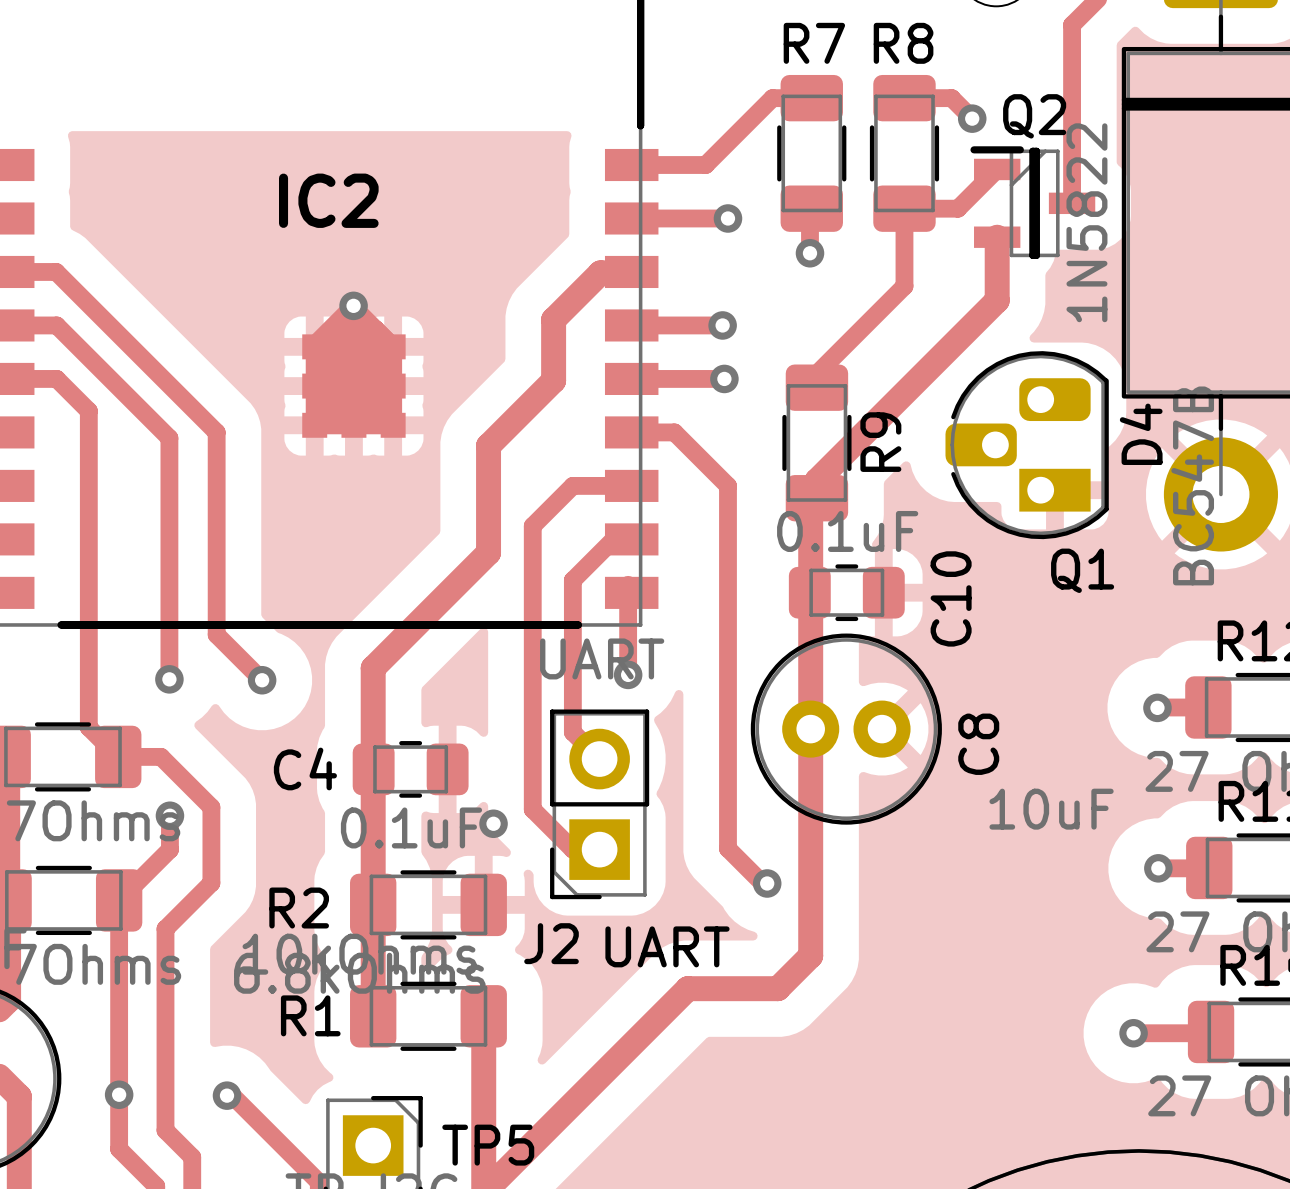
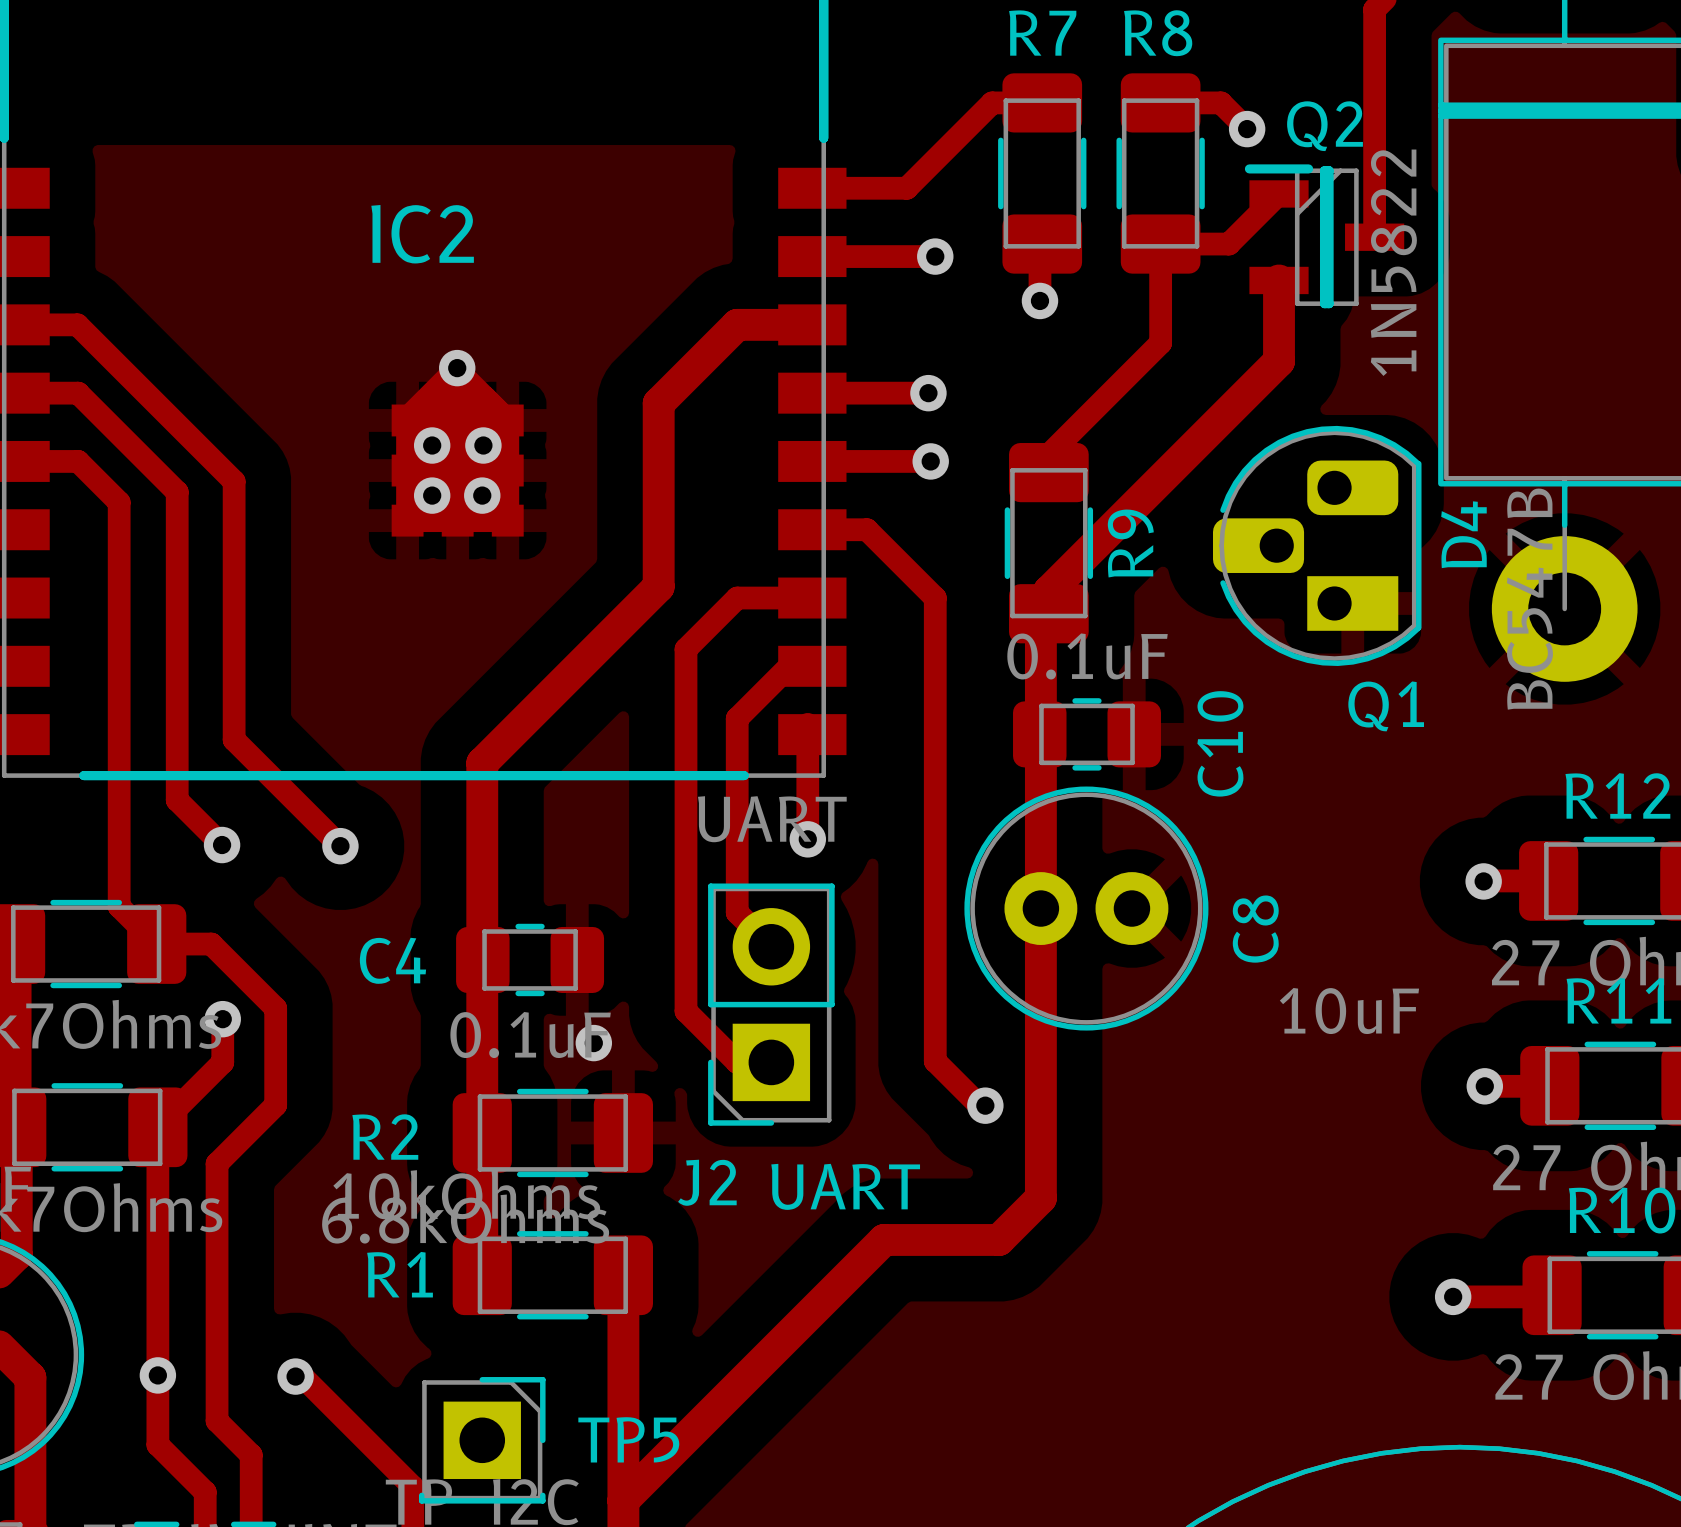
track: (620, 271) (600, 272) (553, 319) (553, 380) (488, 445) (488, 552) (373, 668) -> (797, 324) (737, 324) (658, 403) (658, 586) (482, 763) (482, 830)
via: none -> (432, 445)
via: none -> (483, 445)
track: (178, 394) (216, 432) (216, 634) -> (234, 481) (234, 739) (282, 788)
track: (134, 403) (169, 438) (169, 679) -> (177, 492) (177, 800) (222, 845)
via: none -> (432, 495)
via: none -> (482, 495)
via position: (493, 823) -> (593, 1043)

